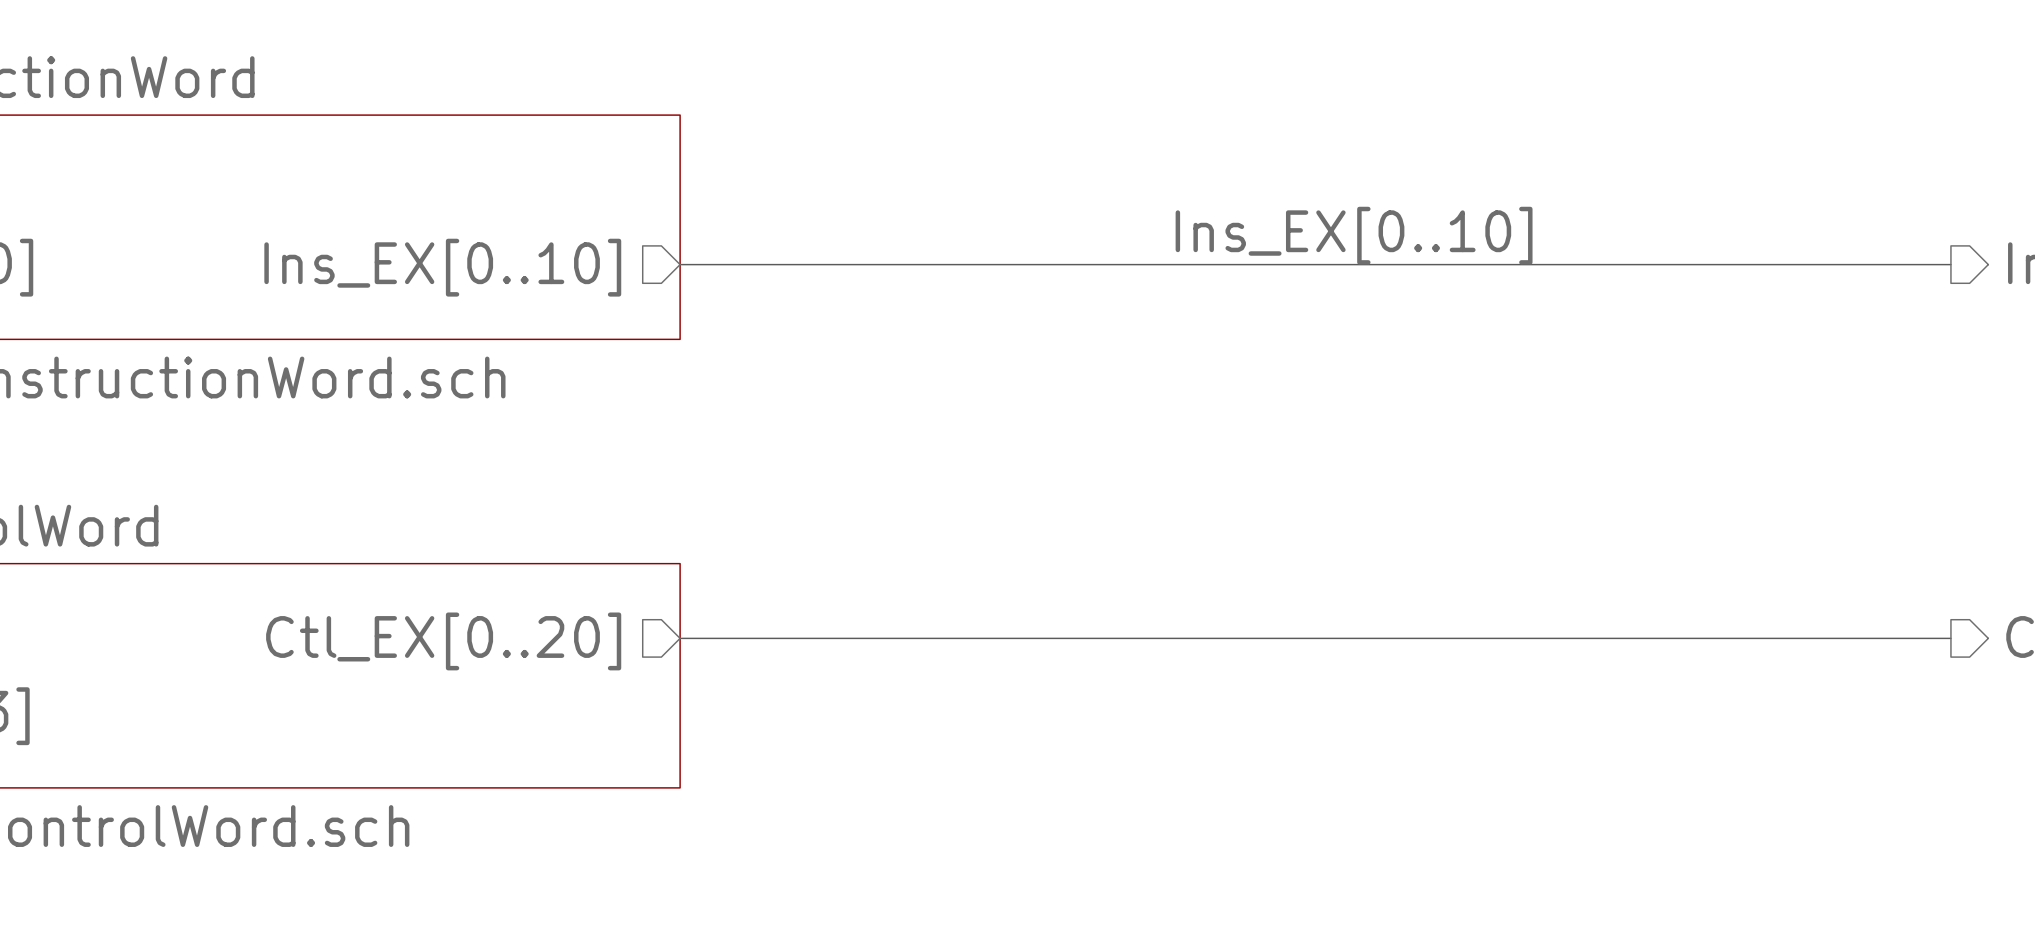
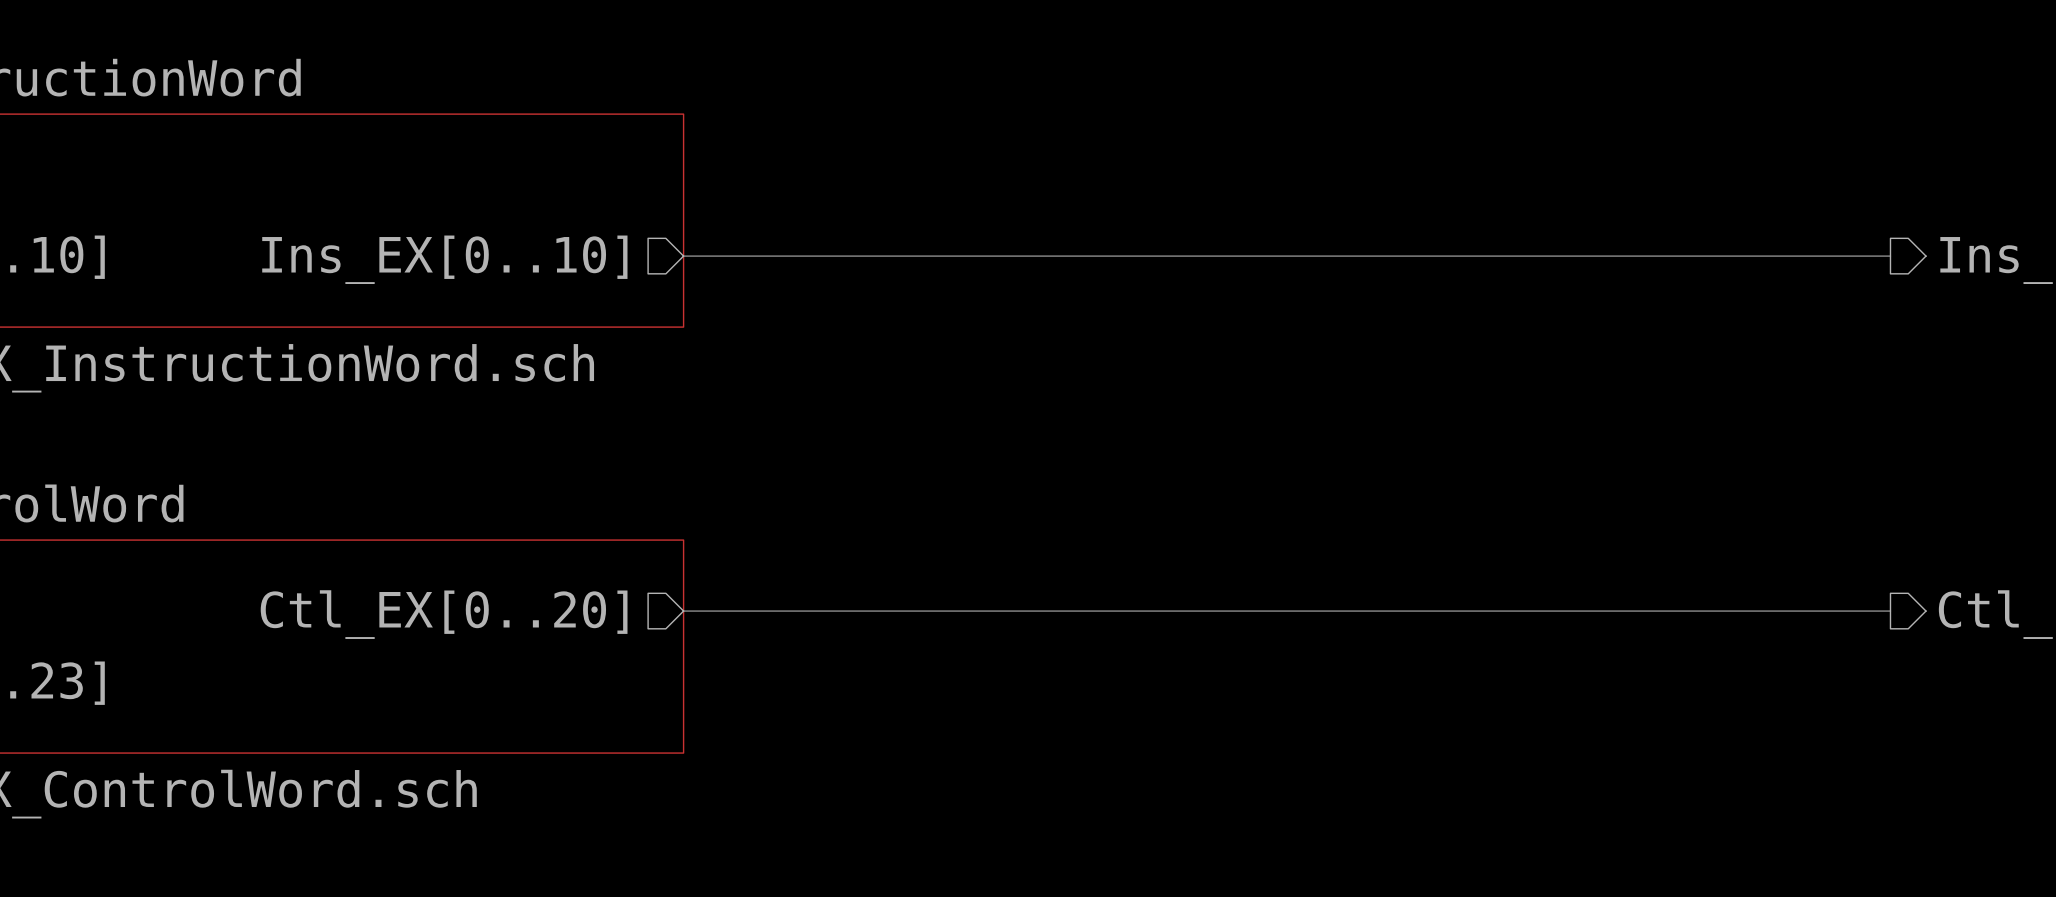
label: Ins_EX[0..10] (1354, 235) -> none

